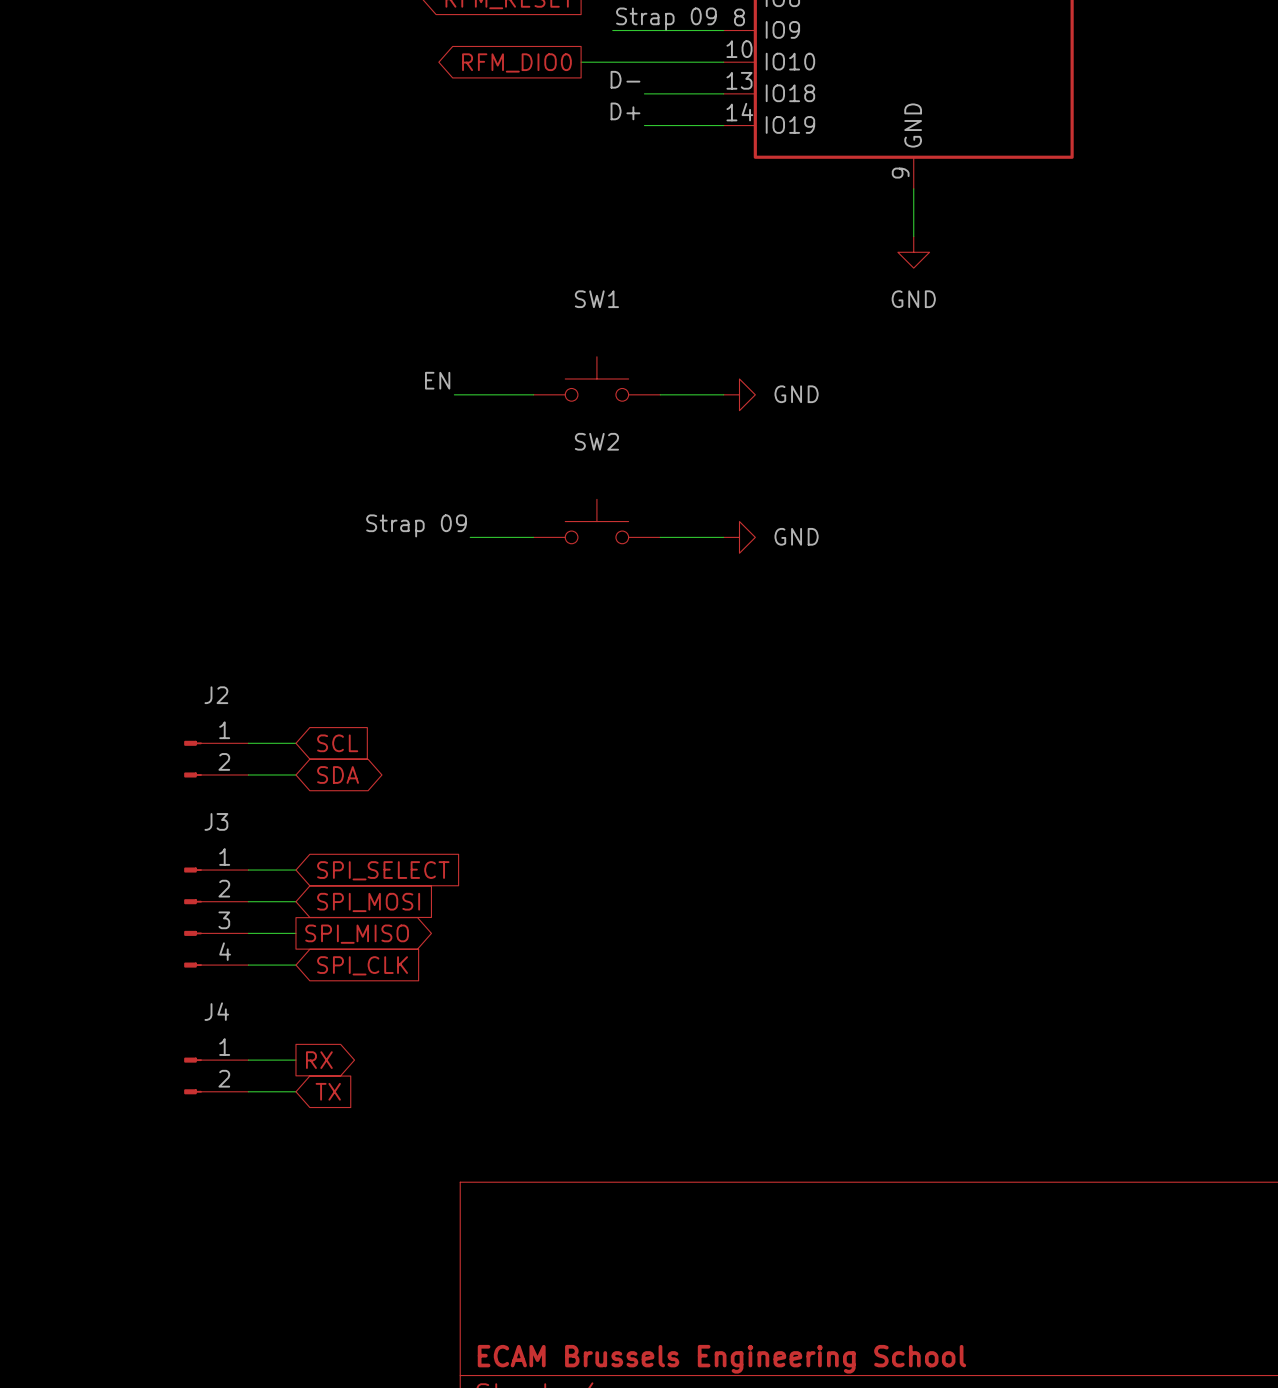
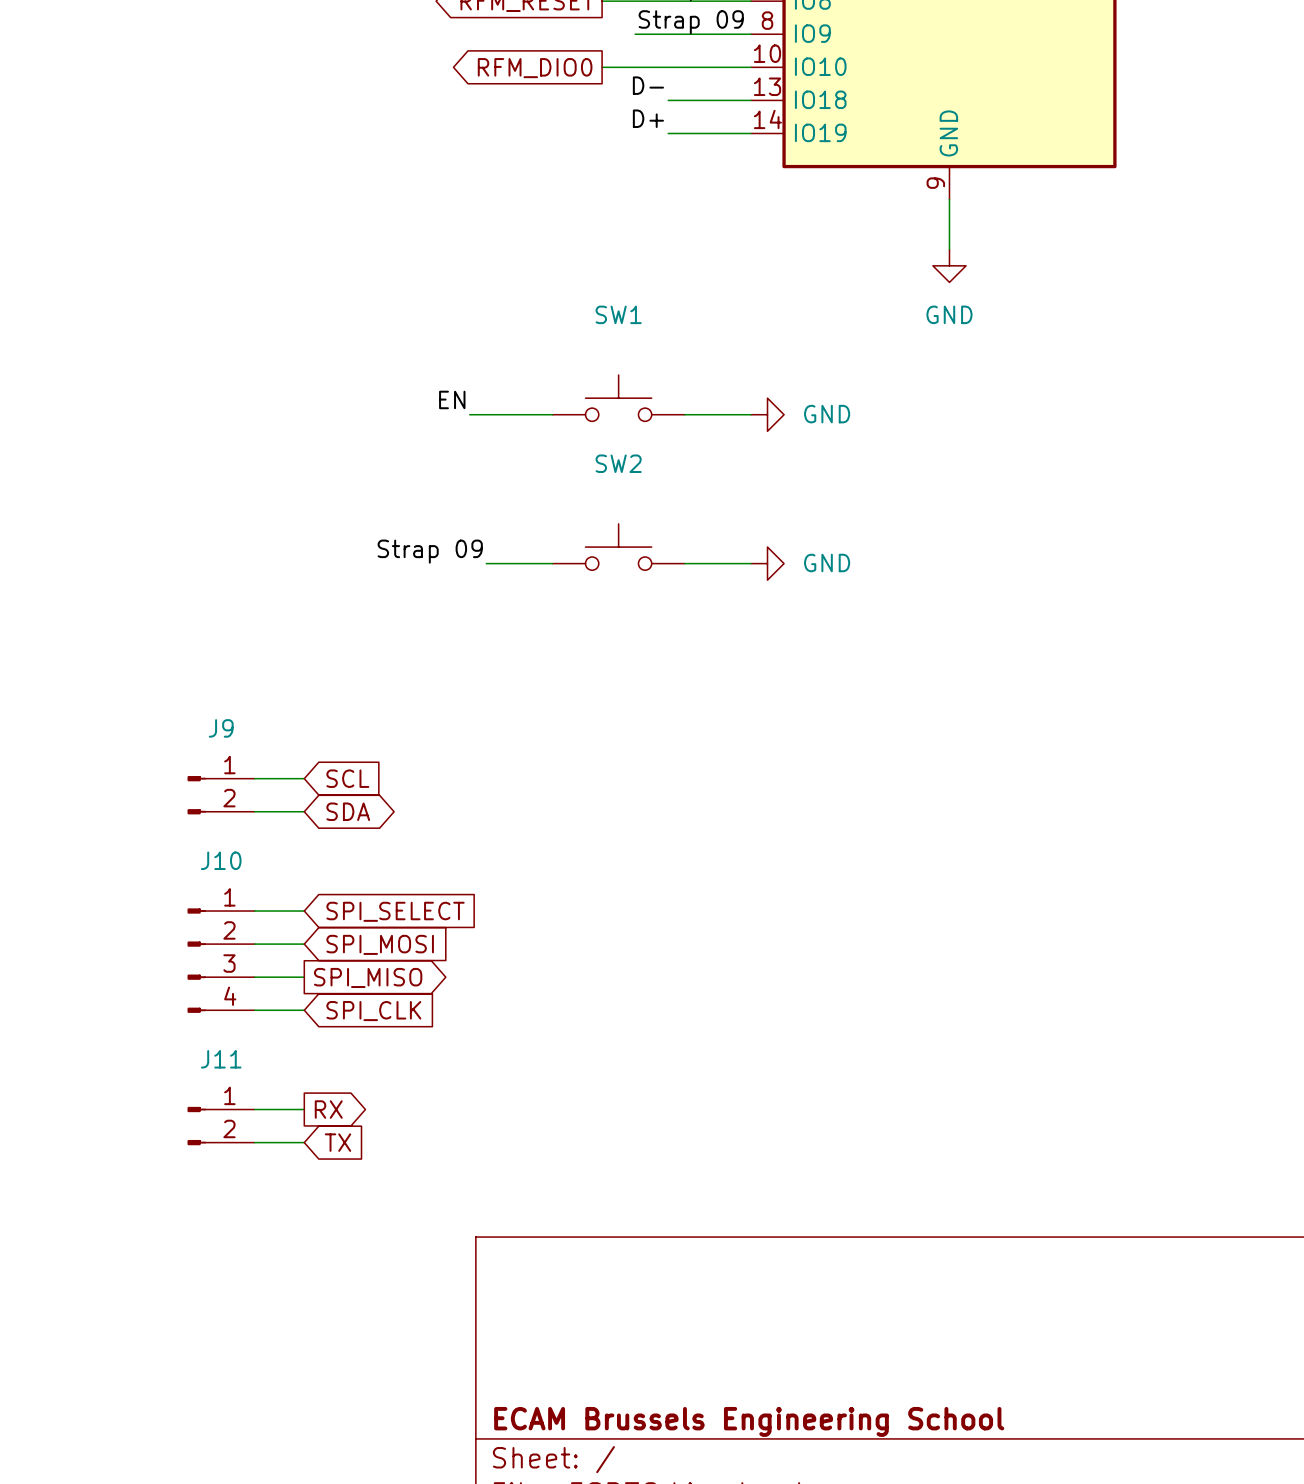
J2 name: J2 (216, 695) -> J9 (221, 728)
J3 name: J3 (216, 821) -> J10 (221, 860)
J4 name: J4 (216, 1011) -> J11 (221, 1059)

